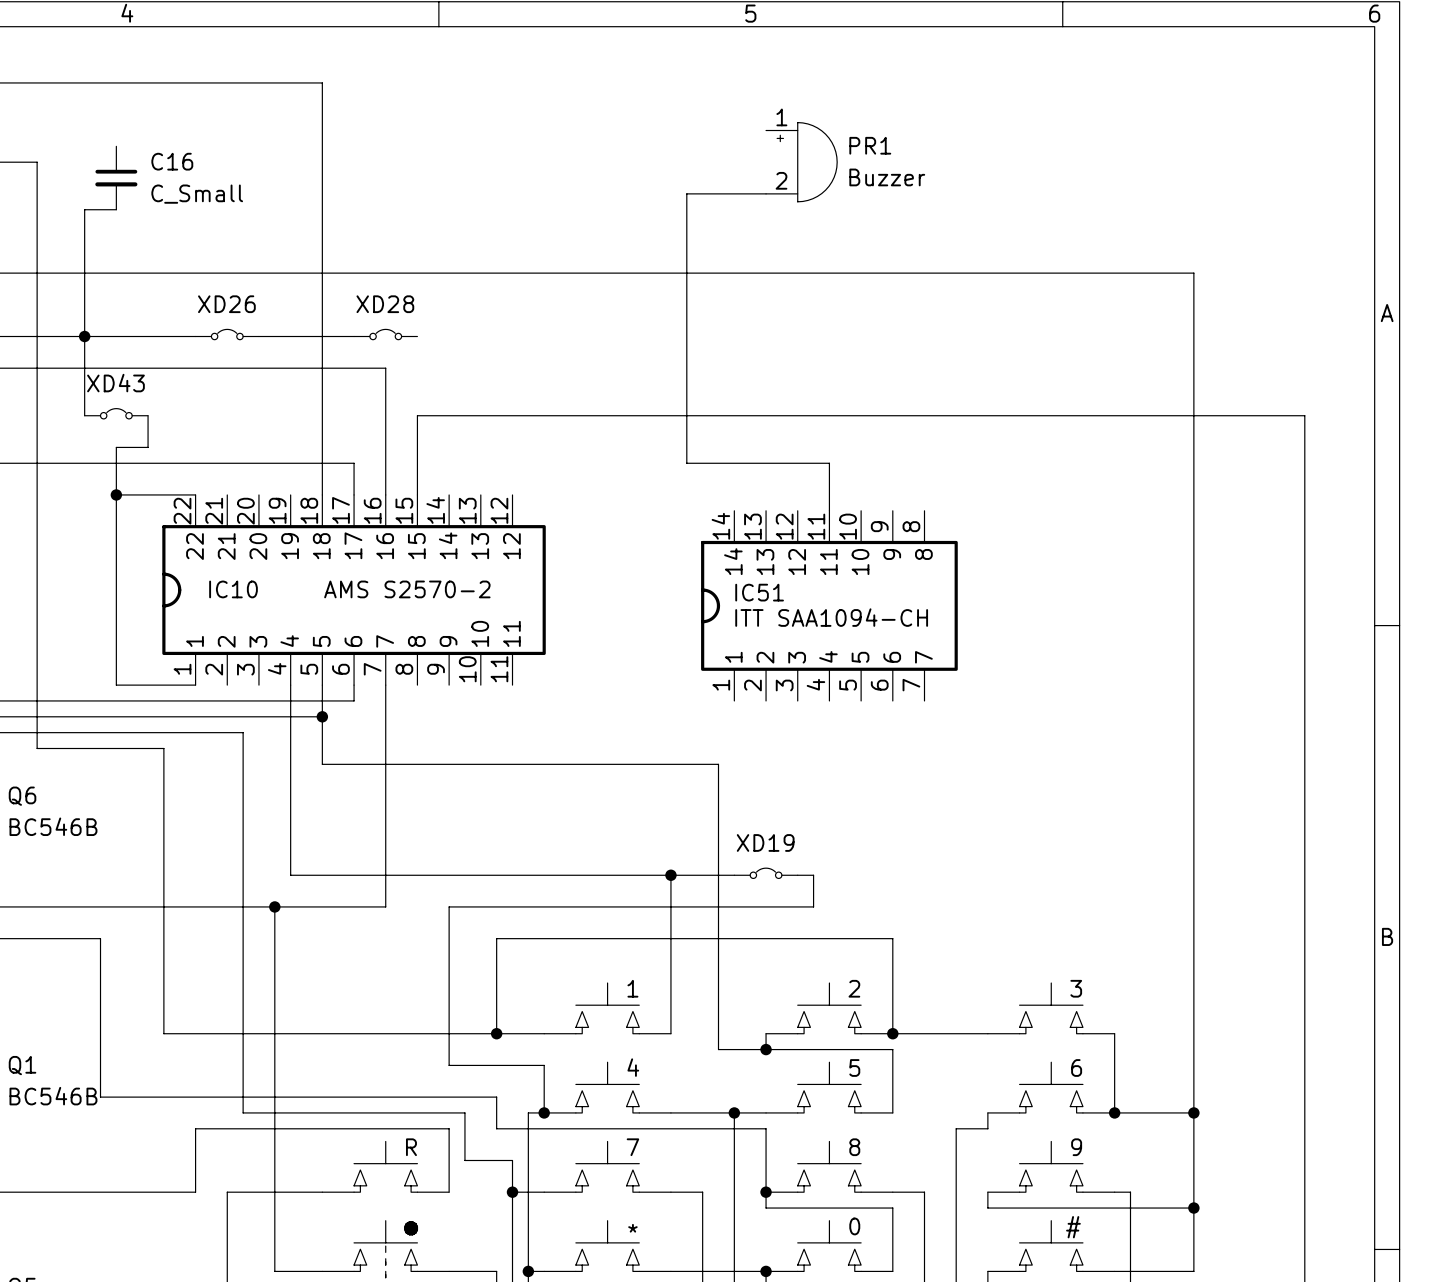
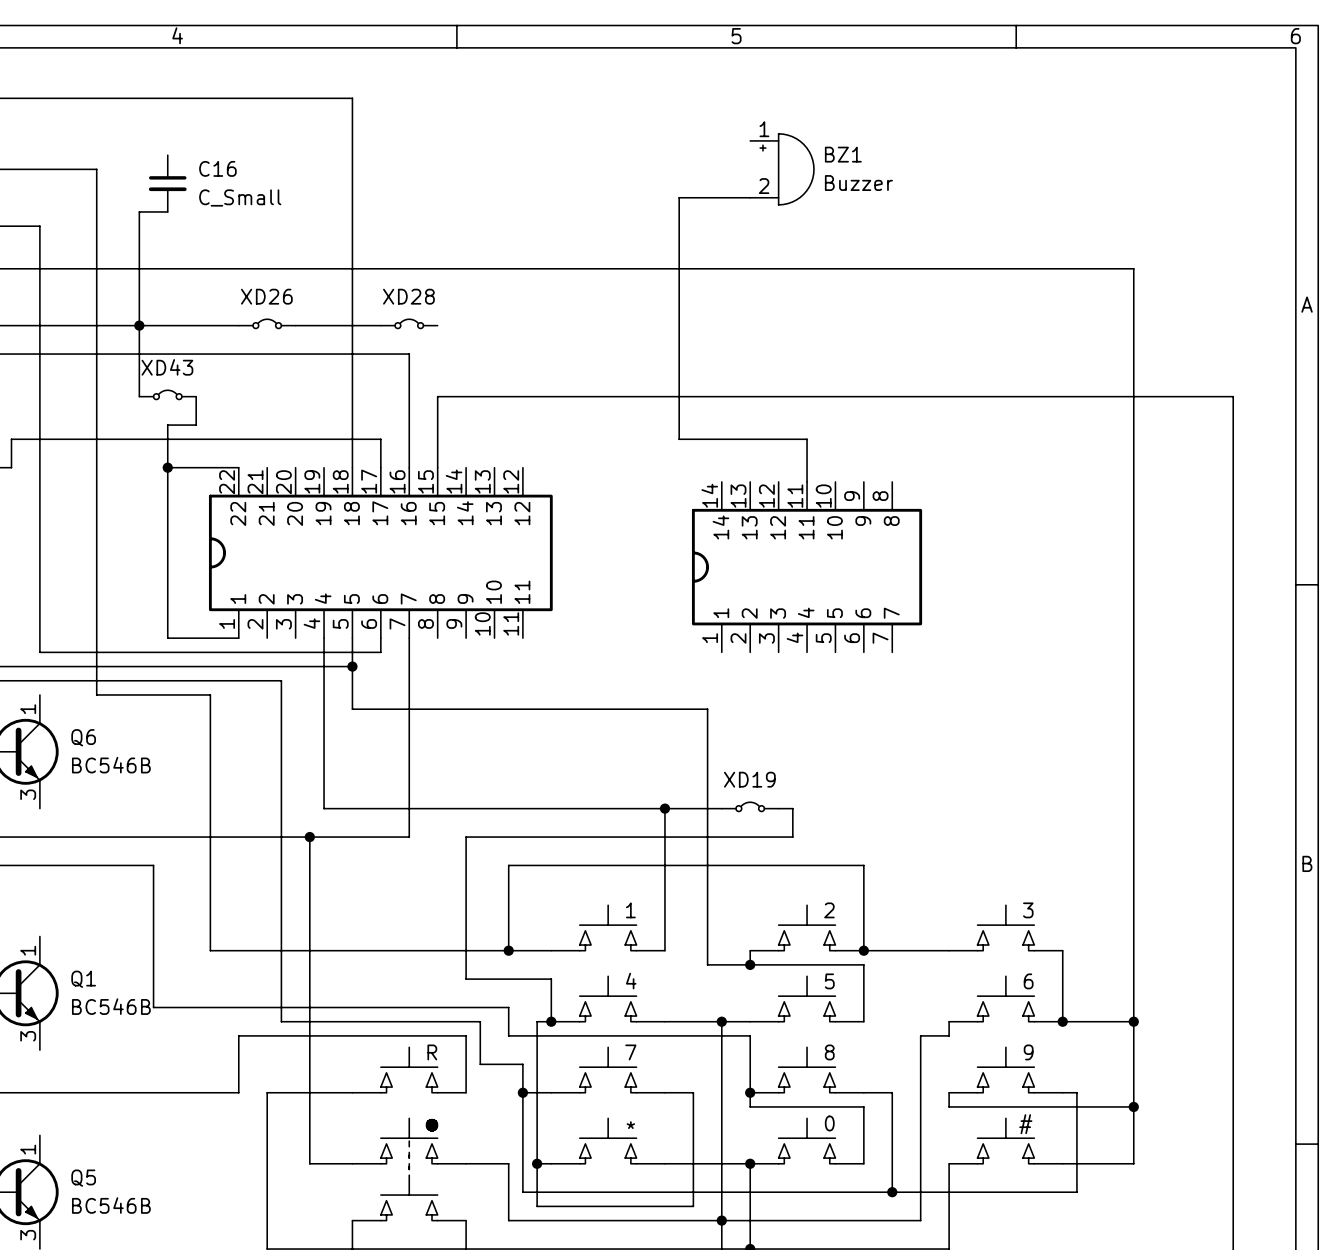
PR1 name: PR1 (870, 145) -> BZ1 (843, 154)
IC10 name: IC10 (233, 589) -> none
IC10 value: AMS S2570-2 (407, 589) -> none
IC51 name: IC51 (759, 592) -> none
IC51 value: ITT SAA1094-CH (831, 617) -> none

